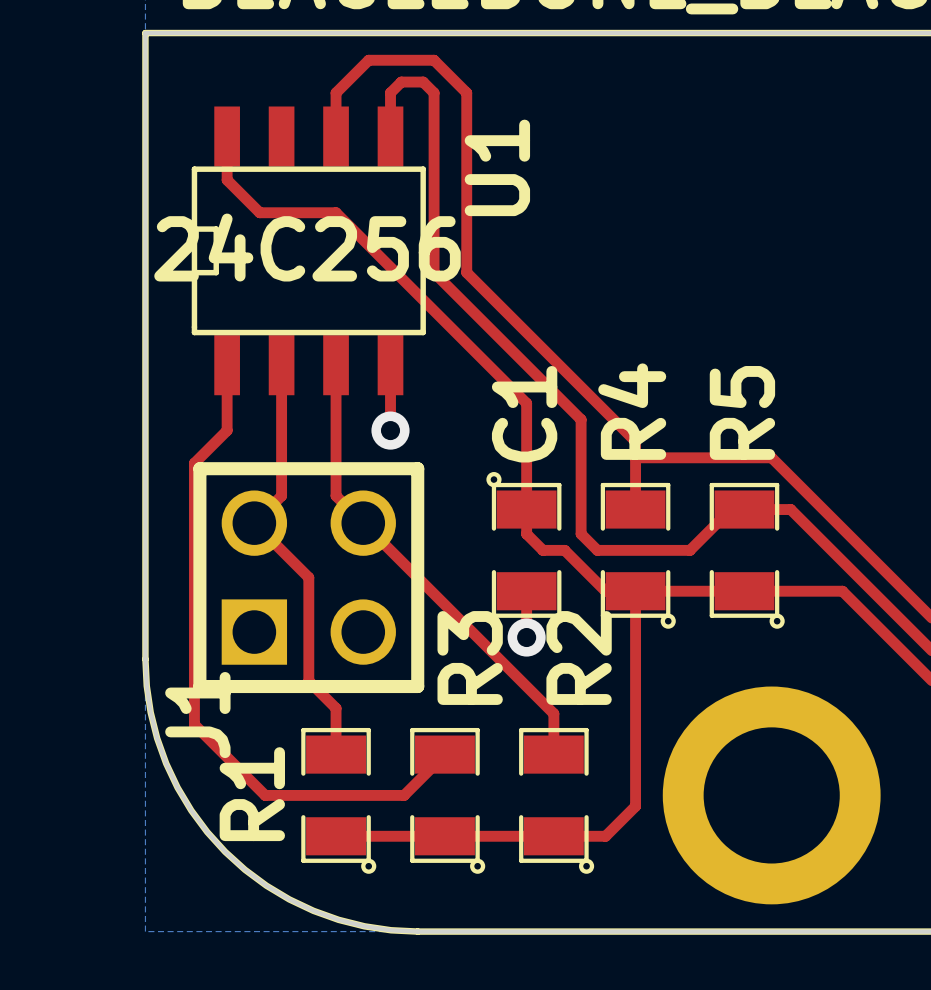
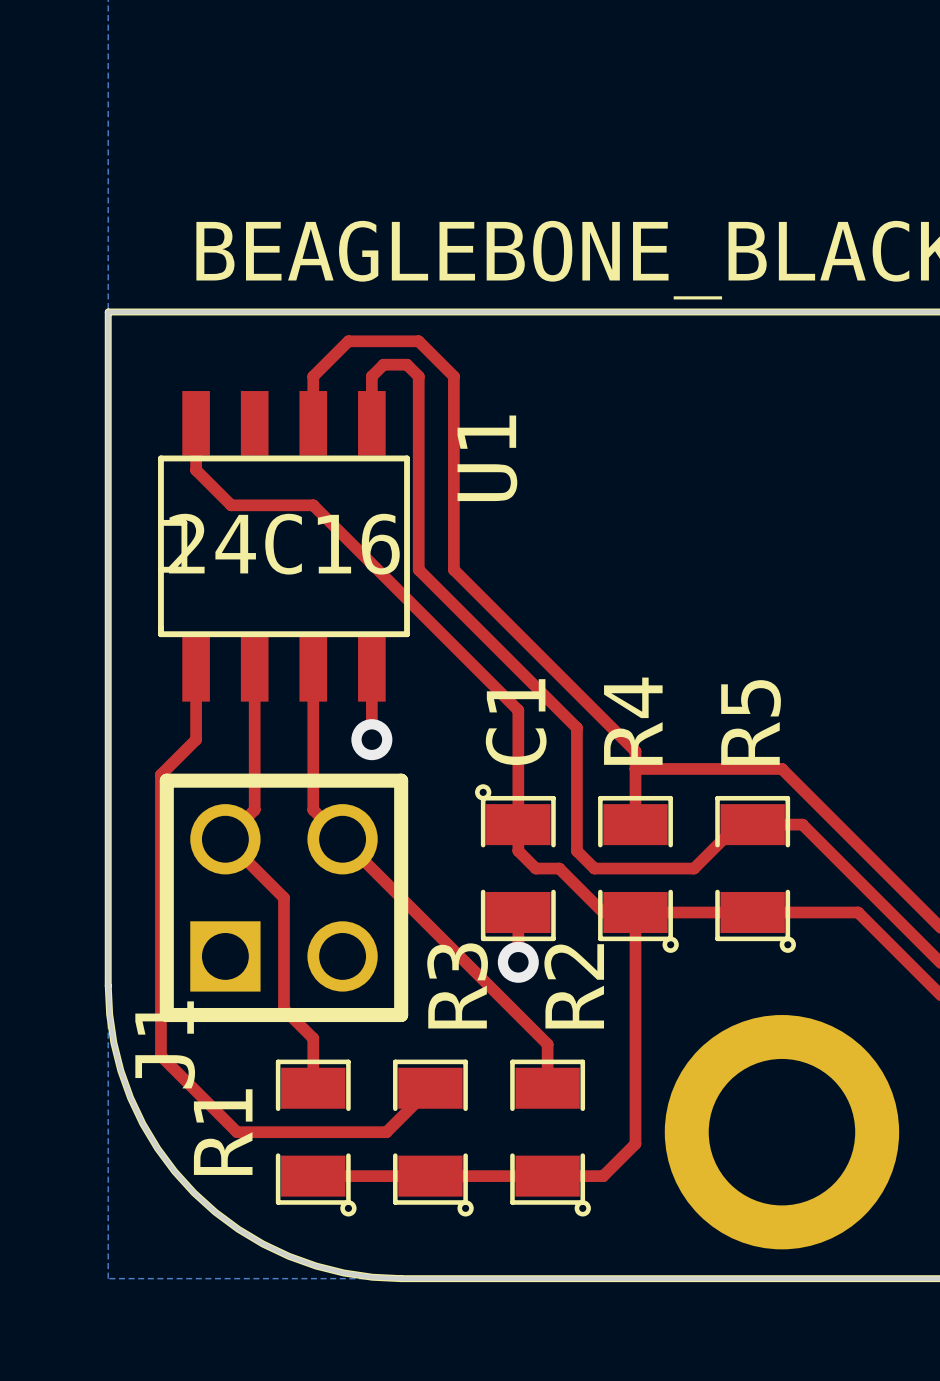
U1 value: 24C256 (307, 247) -> 24C16 (284, 544)

